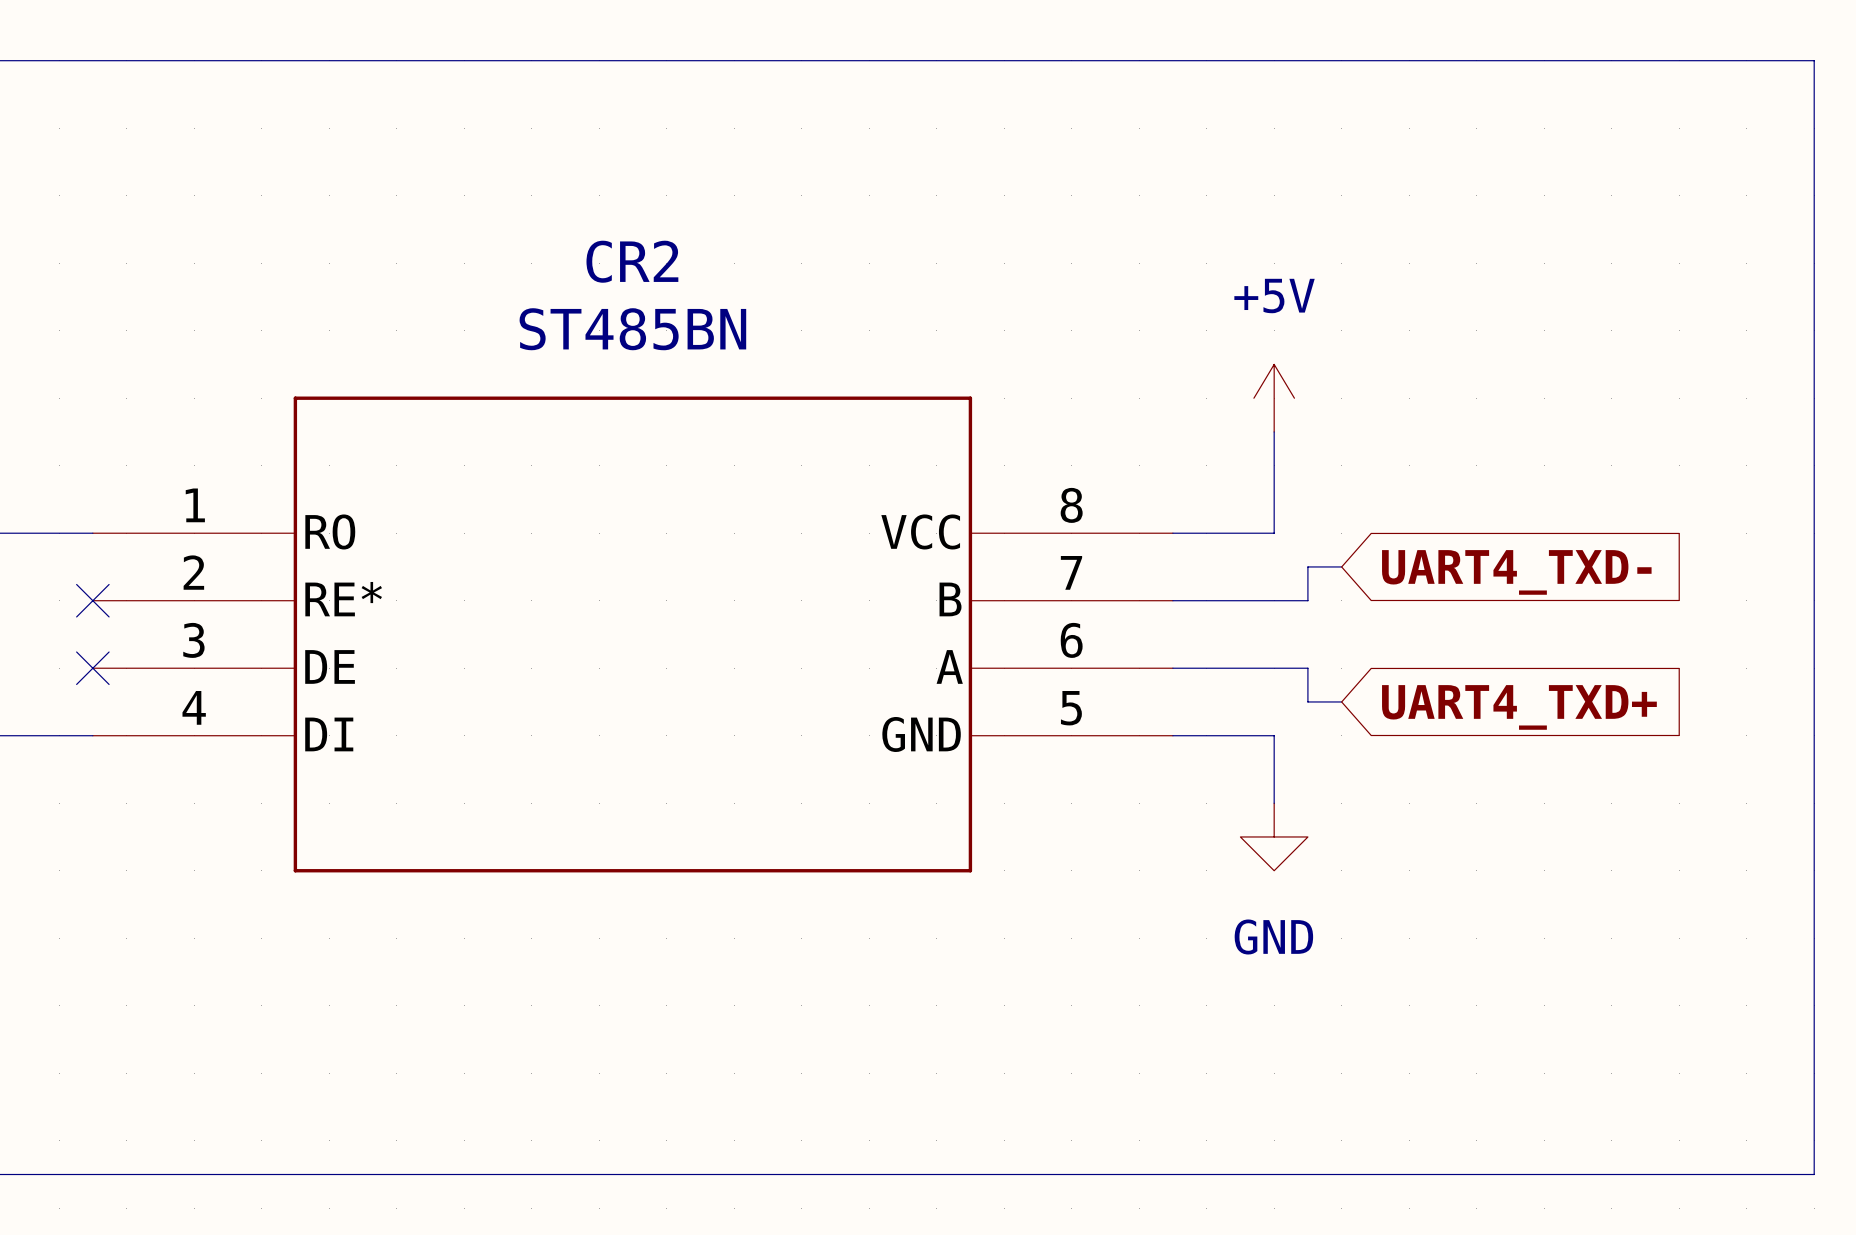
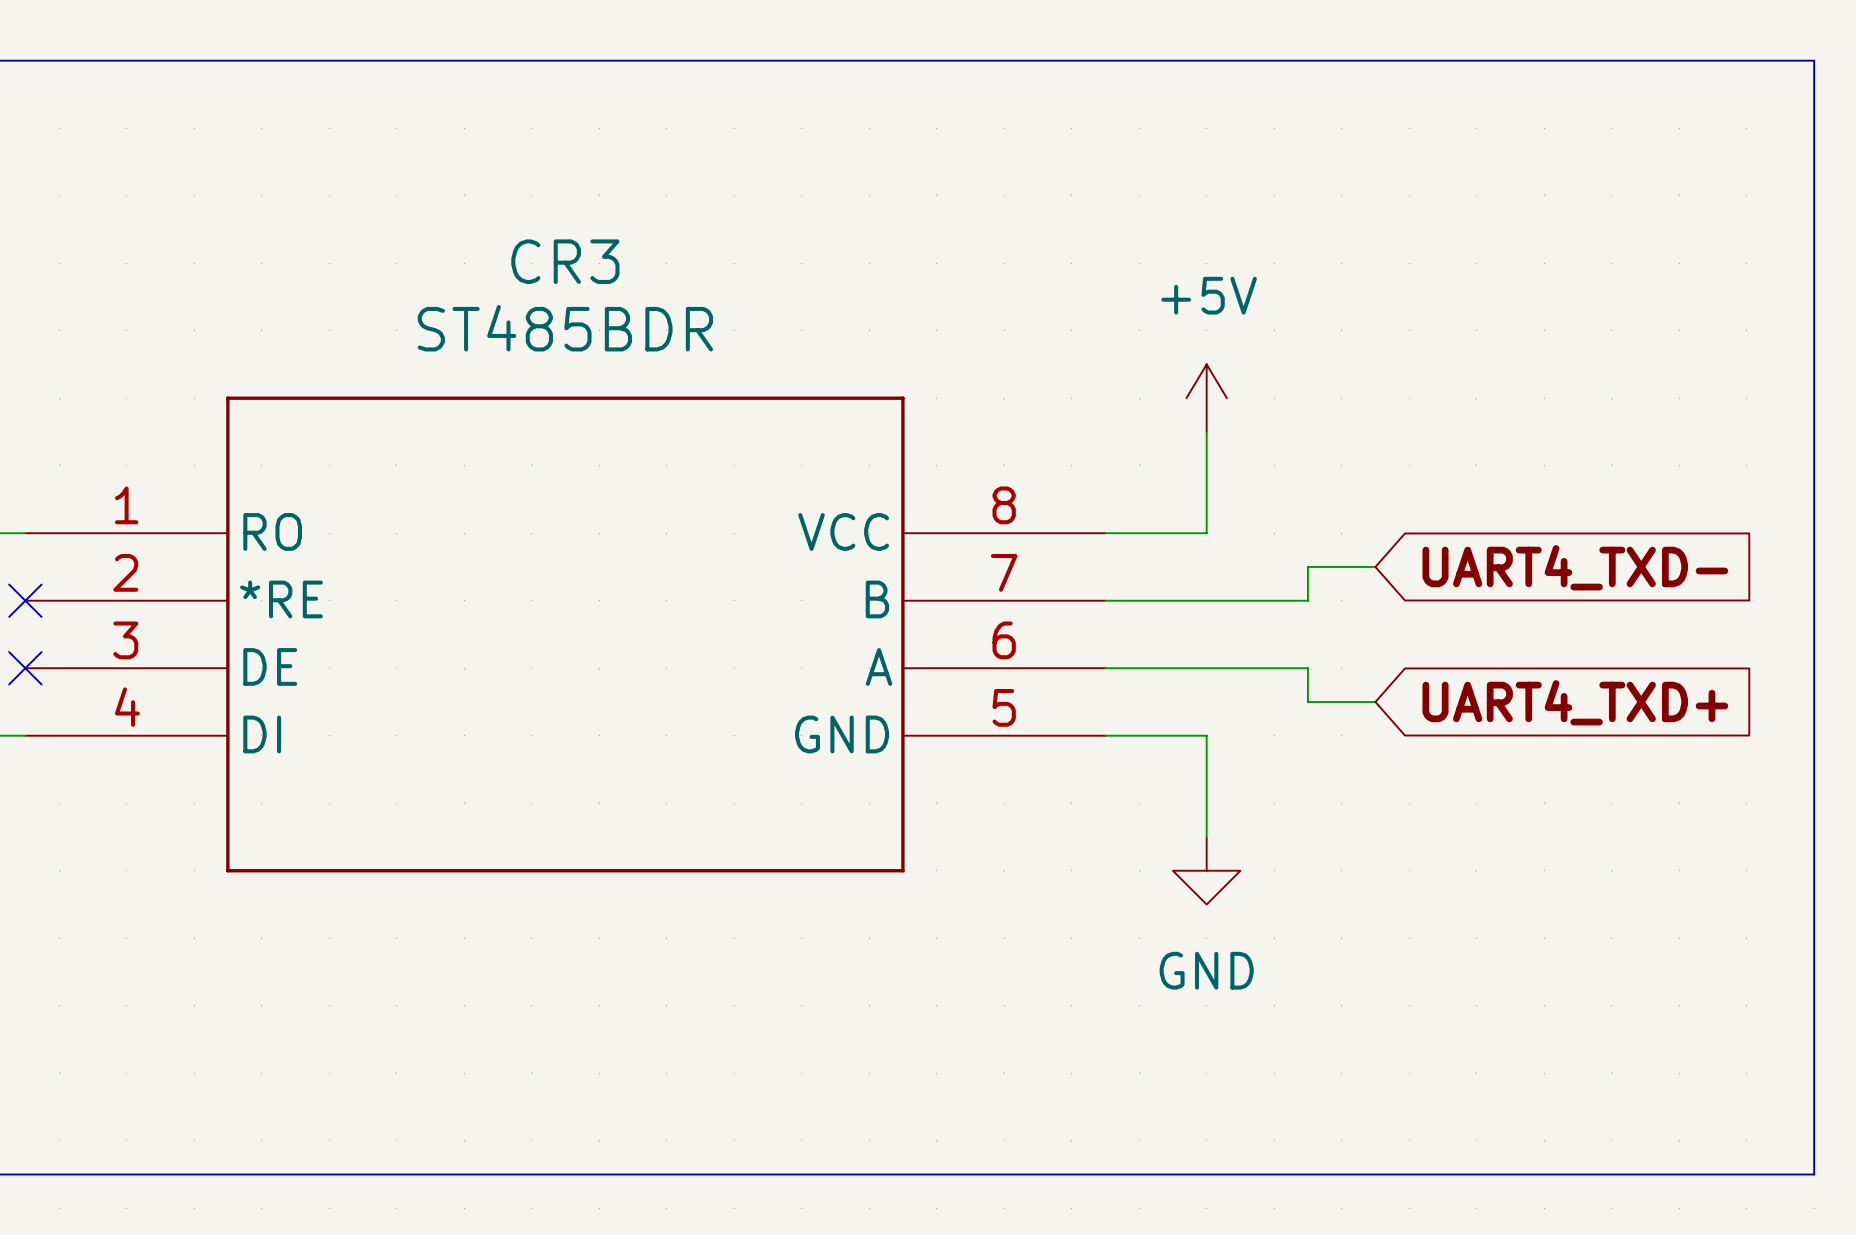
power symbol position: +5V (1274, 398) -> +5V (1206, 398)
wire: (1274, 431) (1274, 533) (1206, 533) -> (1206, 431) (1206, 533)
wire: none -> (1341, 566) (1375, 566)
global label position: UART4_TXD- (1516, 572) -> UART4_TXD- (1575, 567)
no-connect mark: none -> (25, 600)
no-connect mark: (92, 600) -> none
CR3: none -> ST485BDR (565, 634)
CR2: ST485BN (632, 634) -> none
no-connect mark: none -> (25, 668)
no-connect mark: (92, 668) -> none
wire: none -> (1341, 701) (1375, 701)
global label position: UART4_TXD+ (1519, 707) -> UART4_TXD+ (1575, 702)
wire: (1206, 735) (1274, 735) (1274, 803) -> (1206, 735) (1206, 836)
power symbol position: GND (1274, 836) -> GND (1206, 870)

